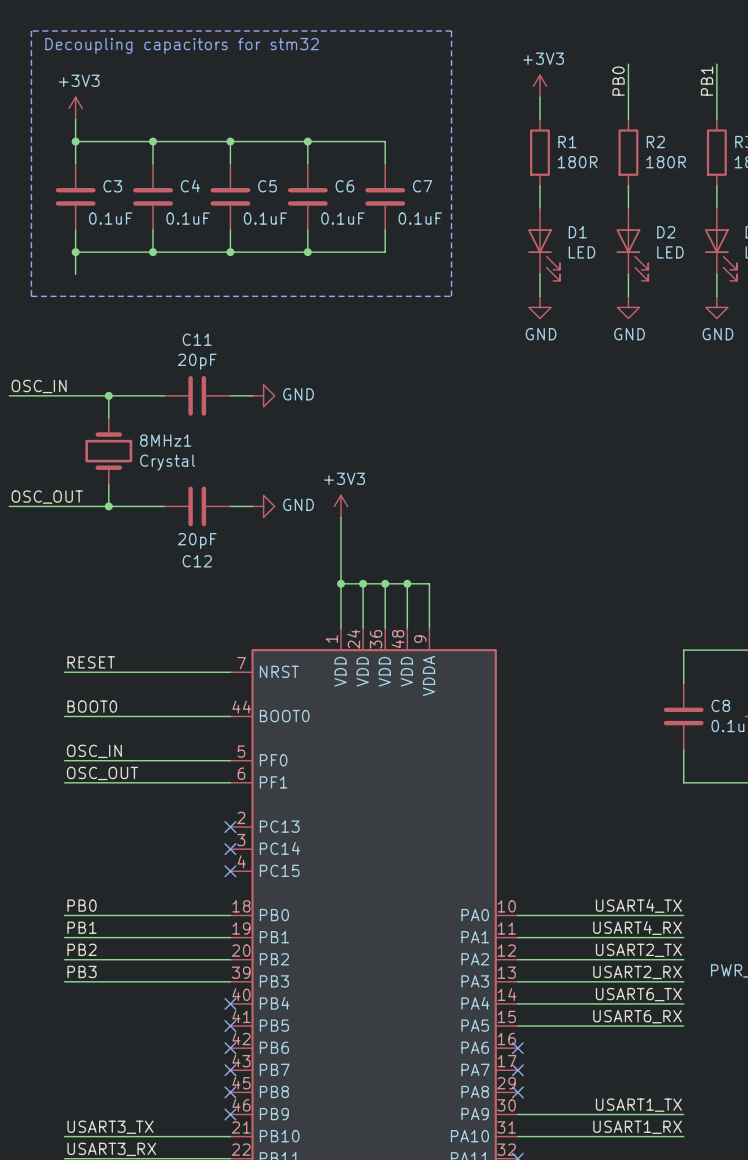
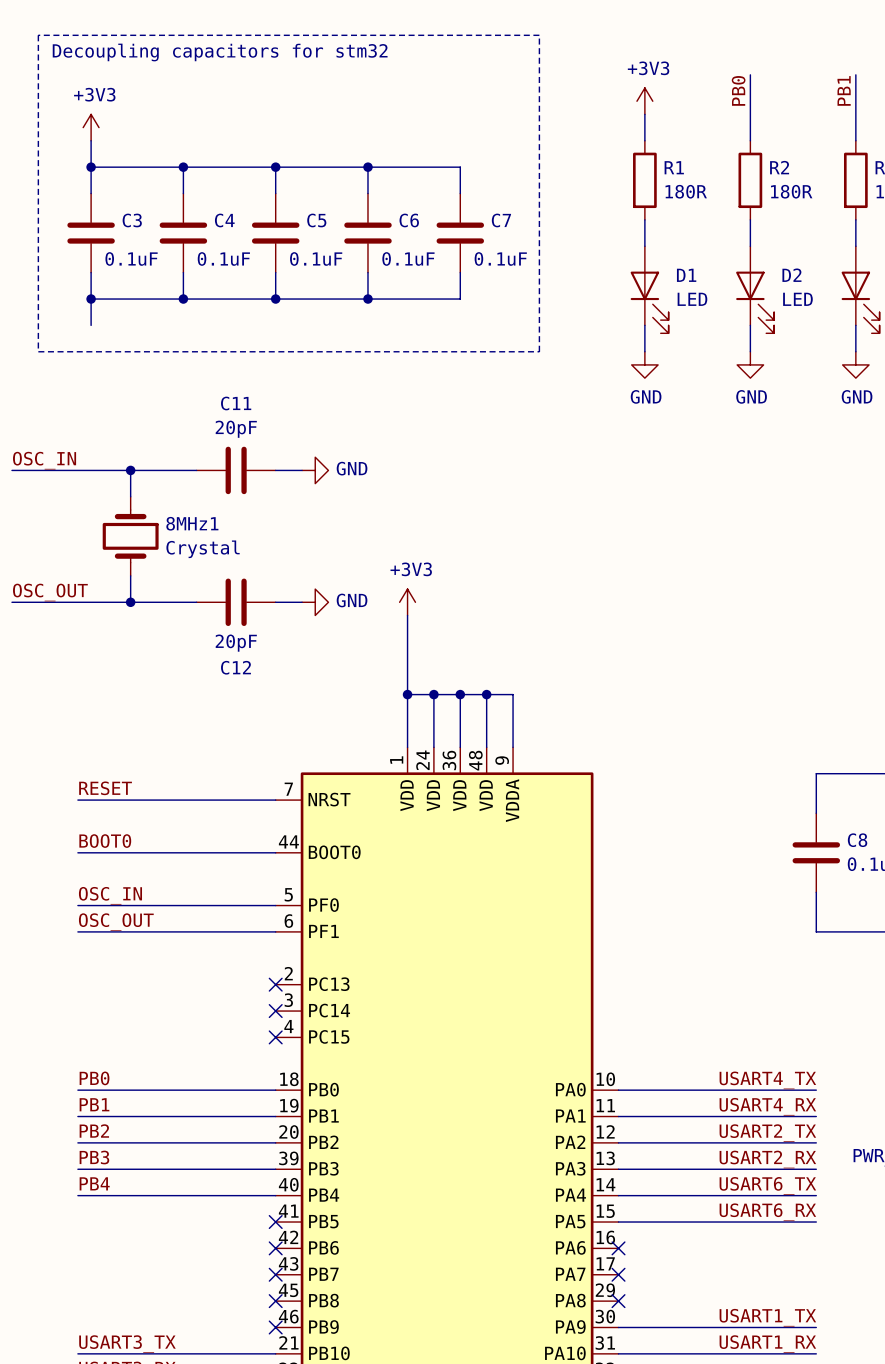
label: none -> PB4 (94, 1183)
wire: none -> (77, 1195) (275, 1195)
no-connect mark: (230, 1003) -> none

